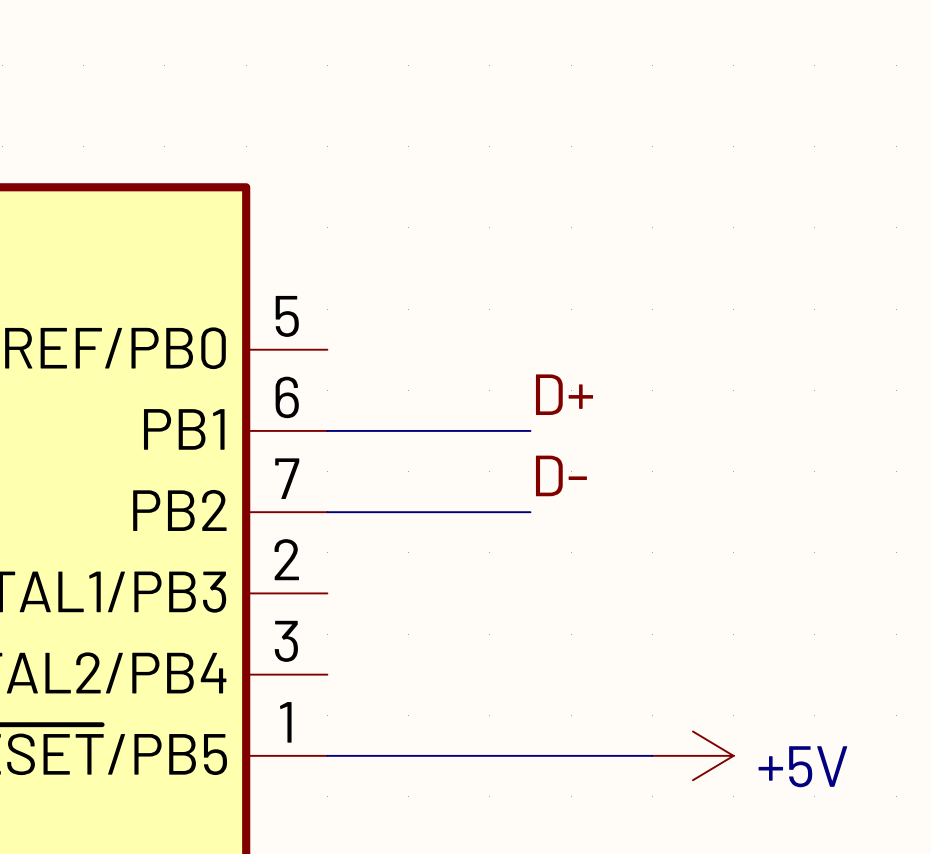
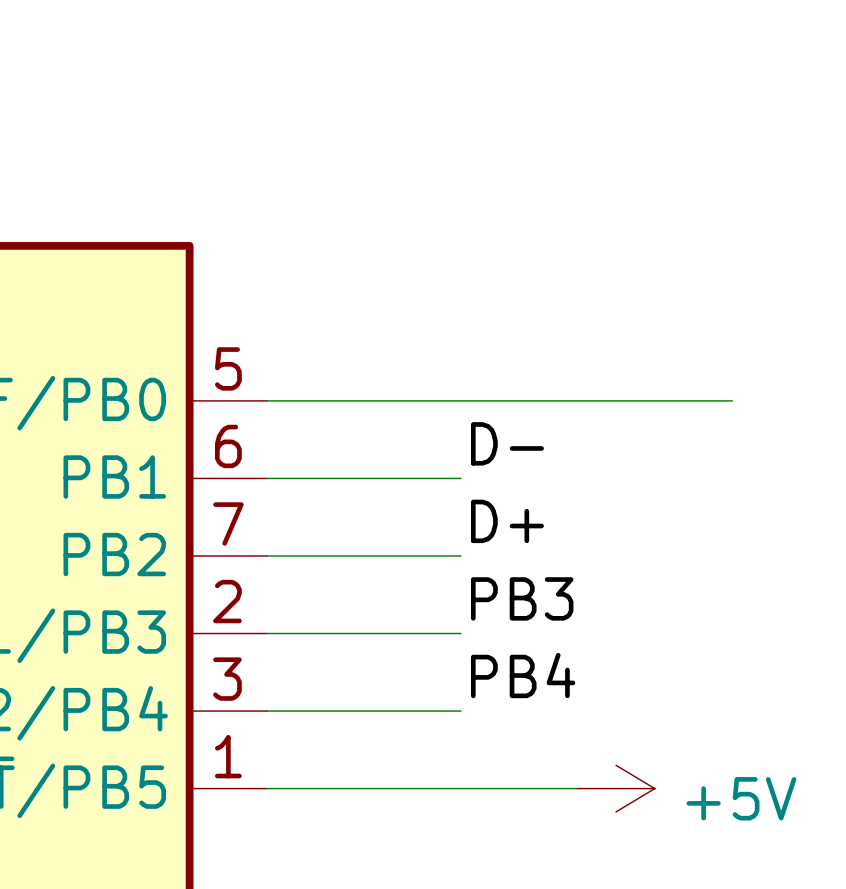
wire: none -> (267, 400) (732, 400)
label: D+ (564, 394) -> D- (507, 443)
label: D- (561, 475) -> D+ (507, 521)
label: none -> PB3 (522, 598)
wire: none -> (267, 633) (461, 633)
label: none -> PB4 (523, 675)
wire: none -> (267, 711) (461, 711)

